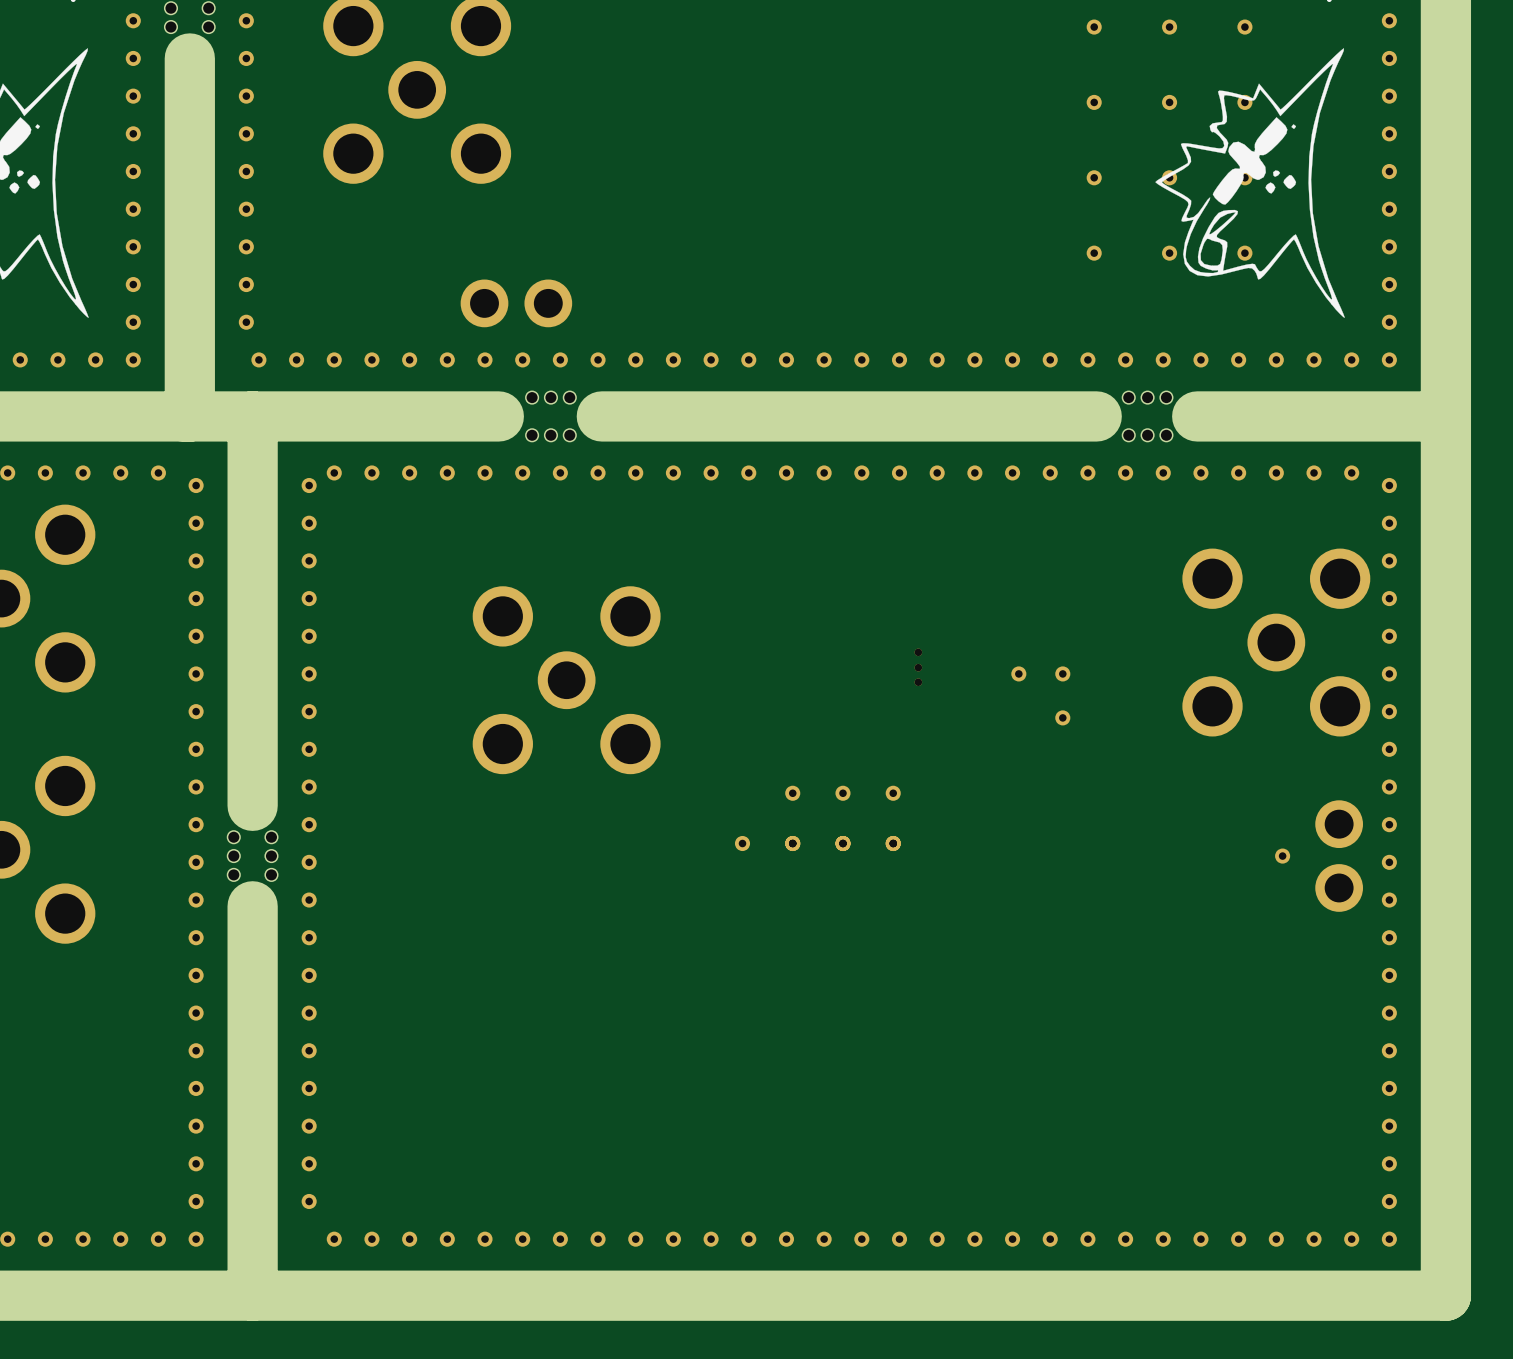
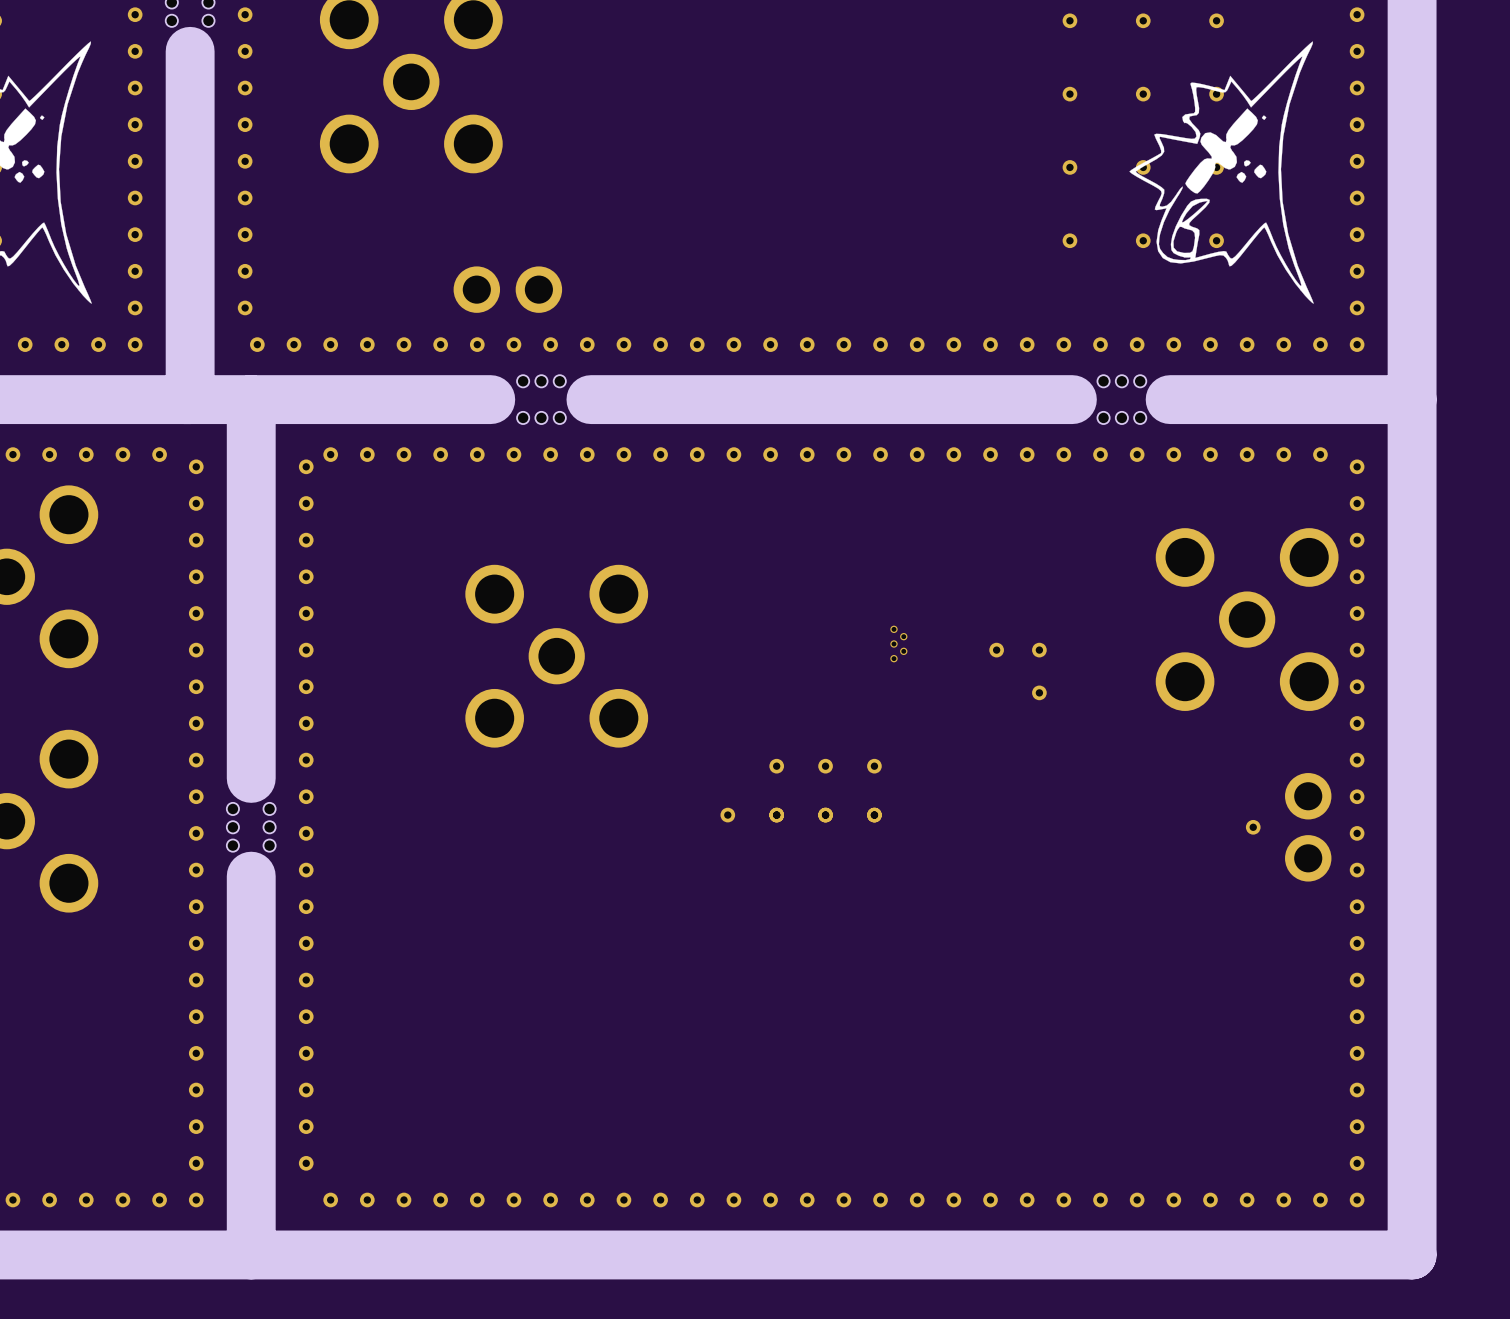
part footprint: [914, 648, 923, 686] -> [890, 625, 908, 663]

